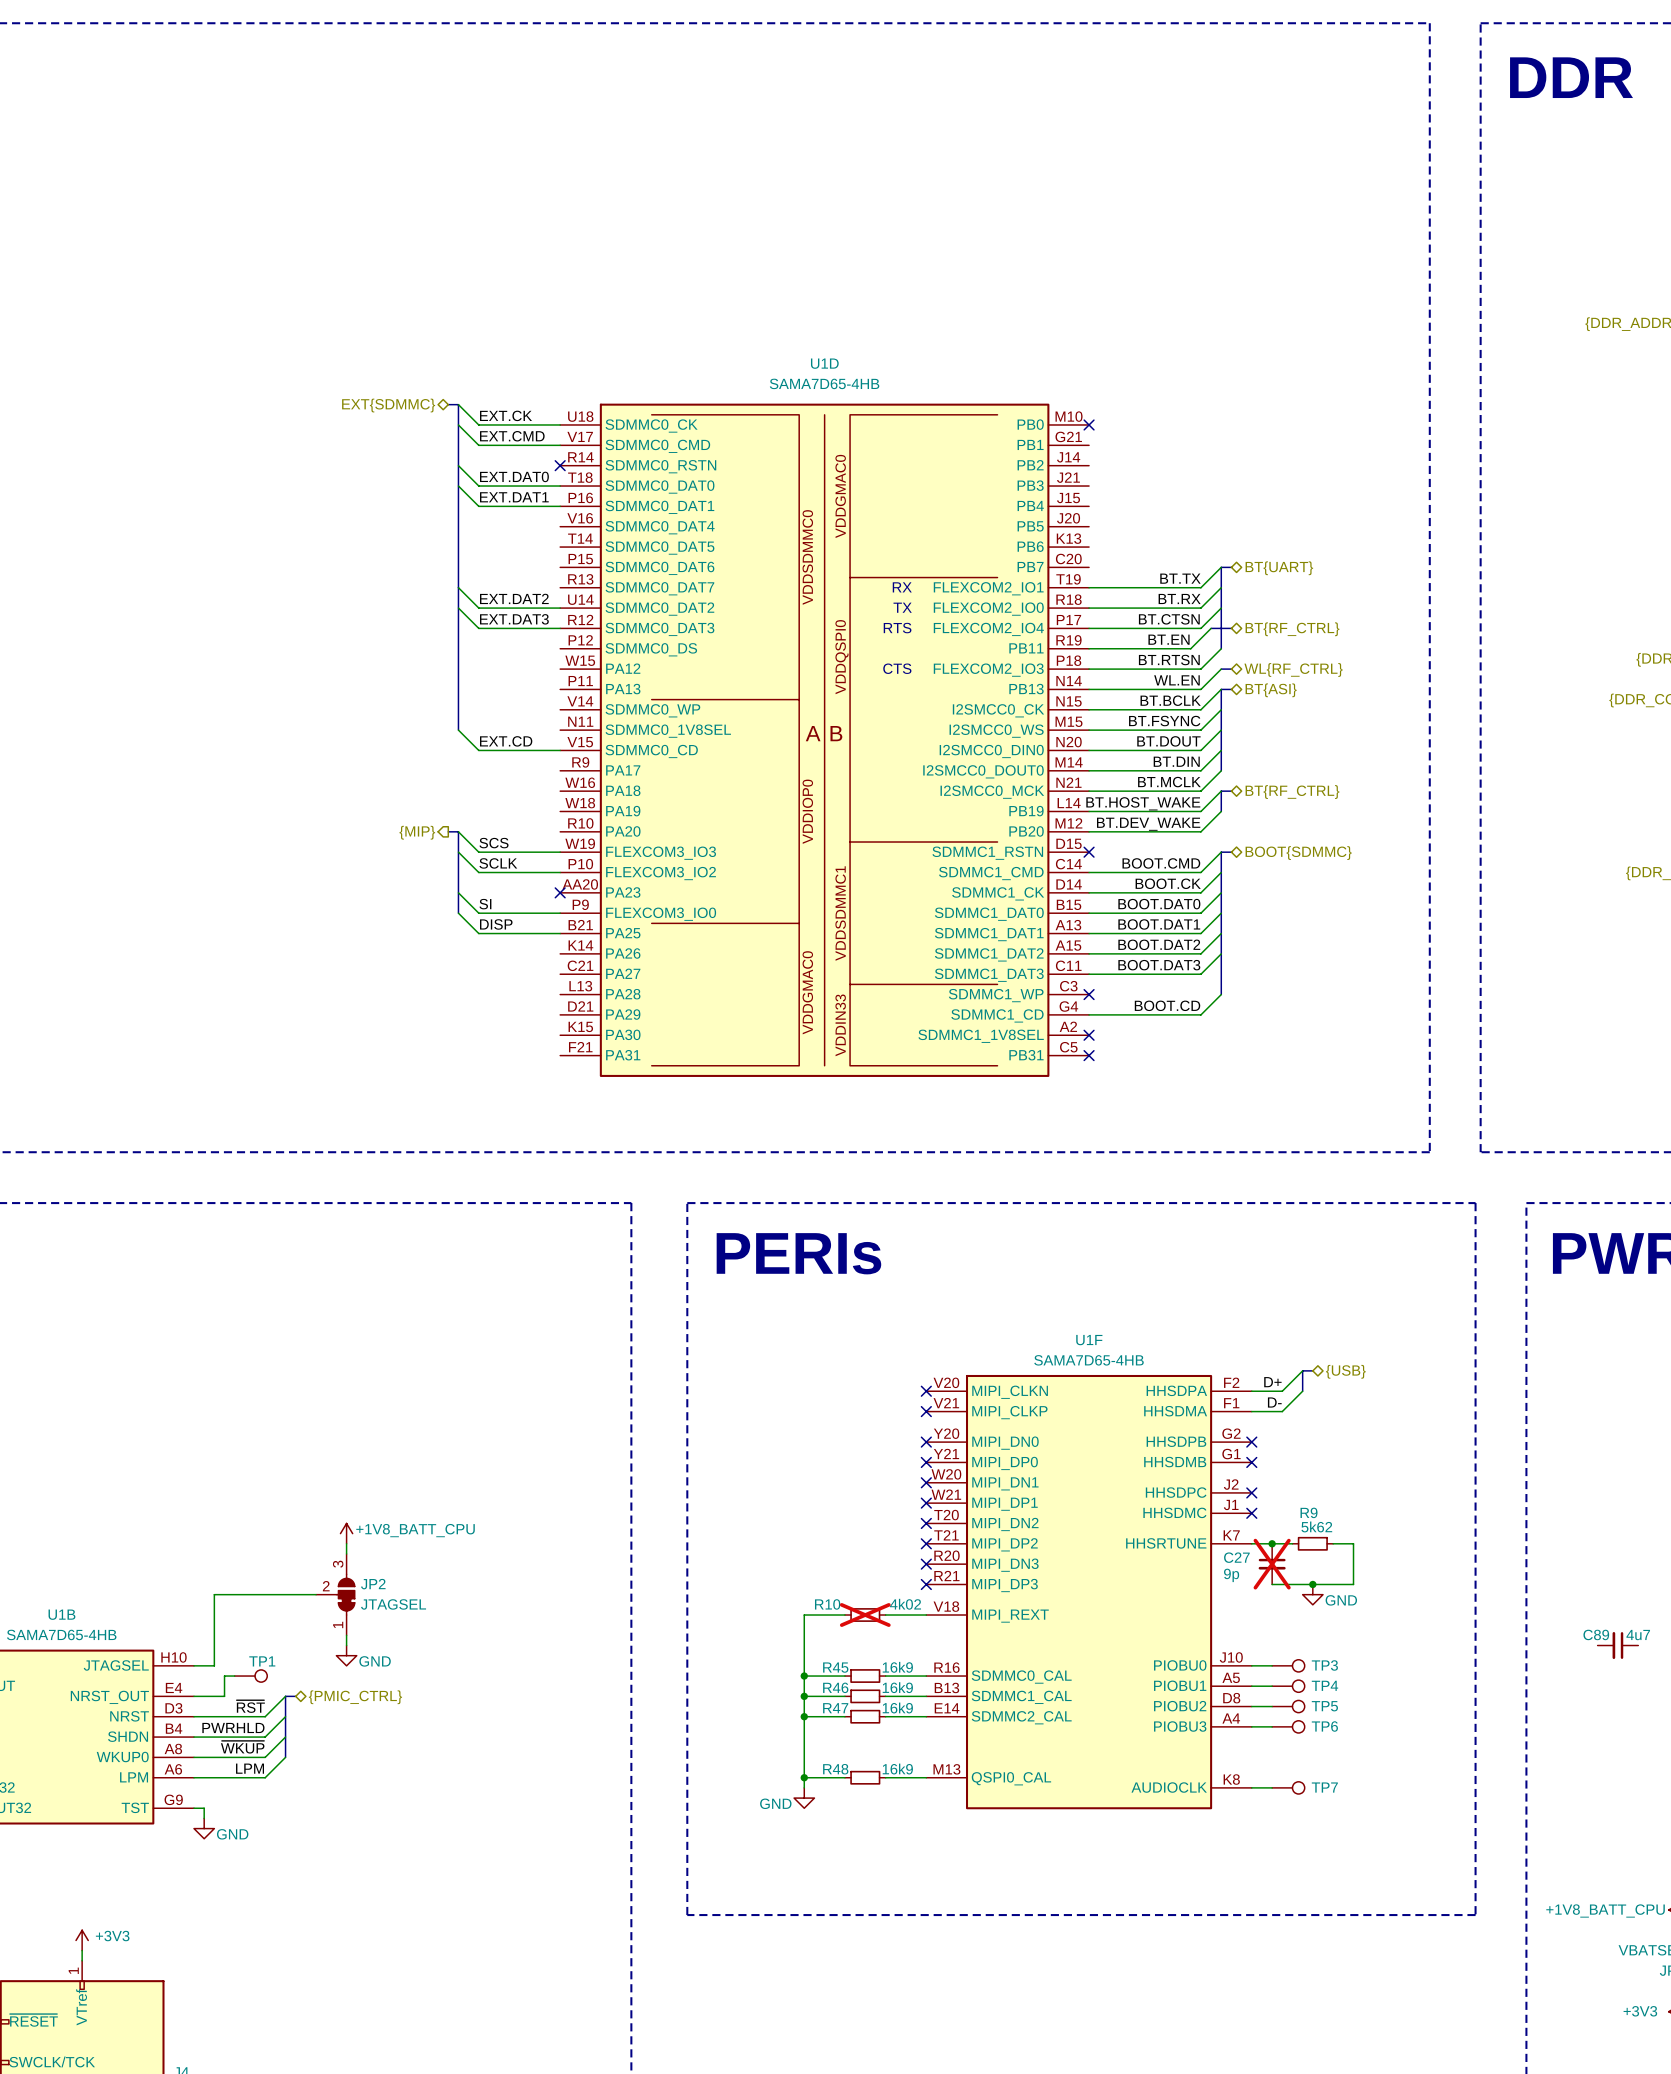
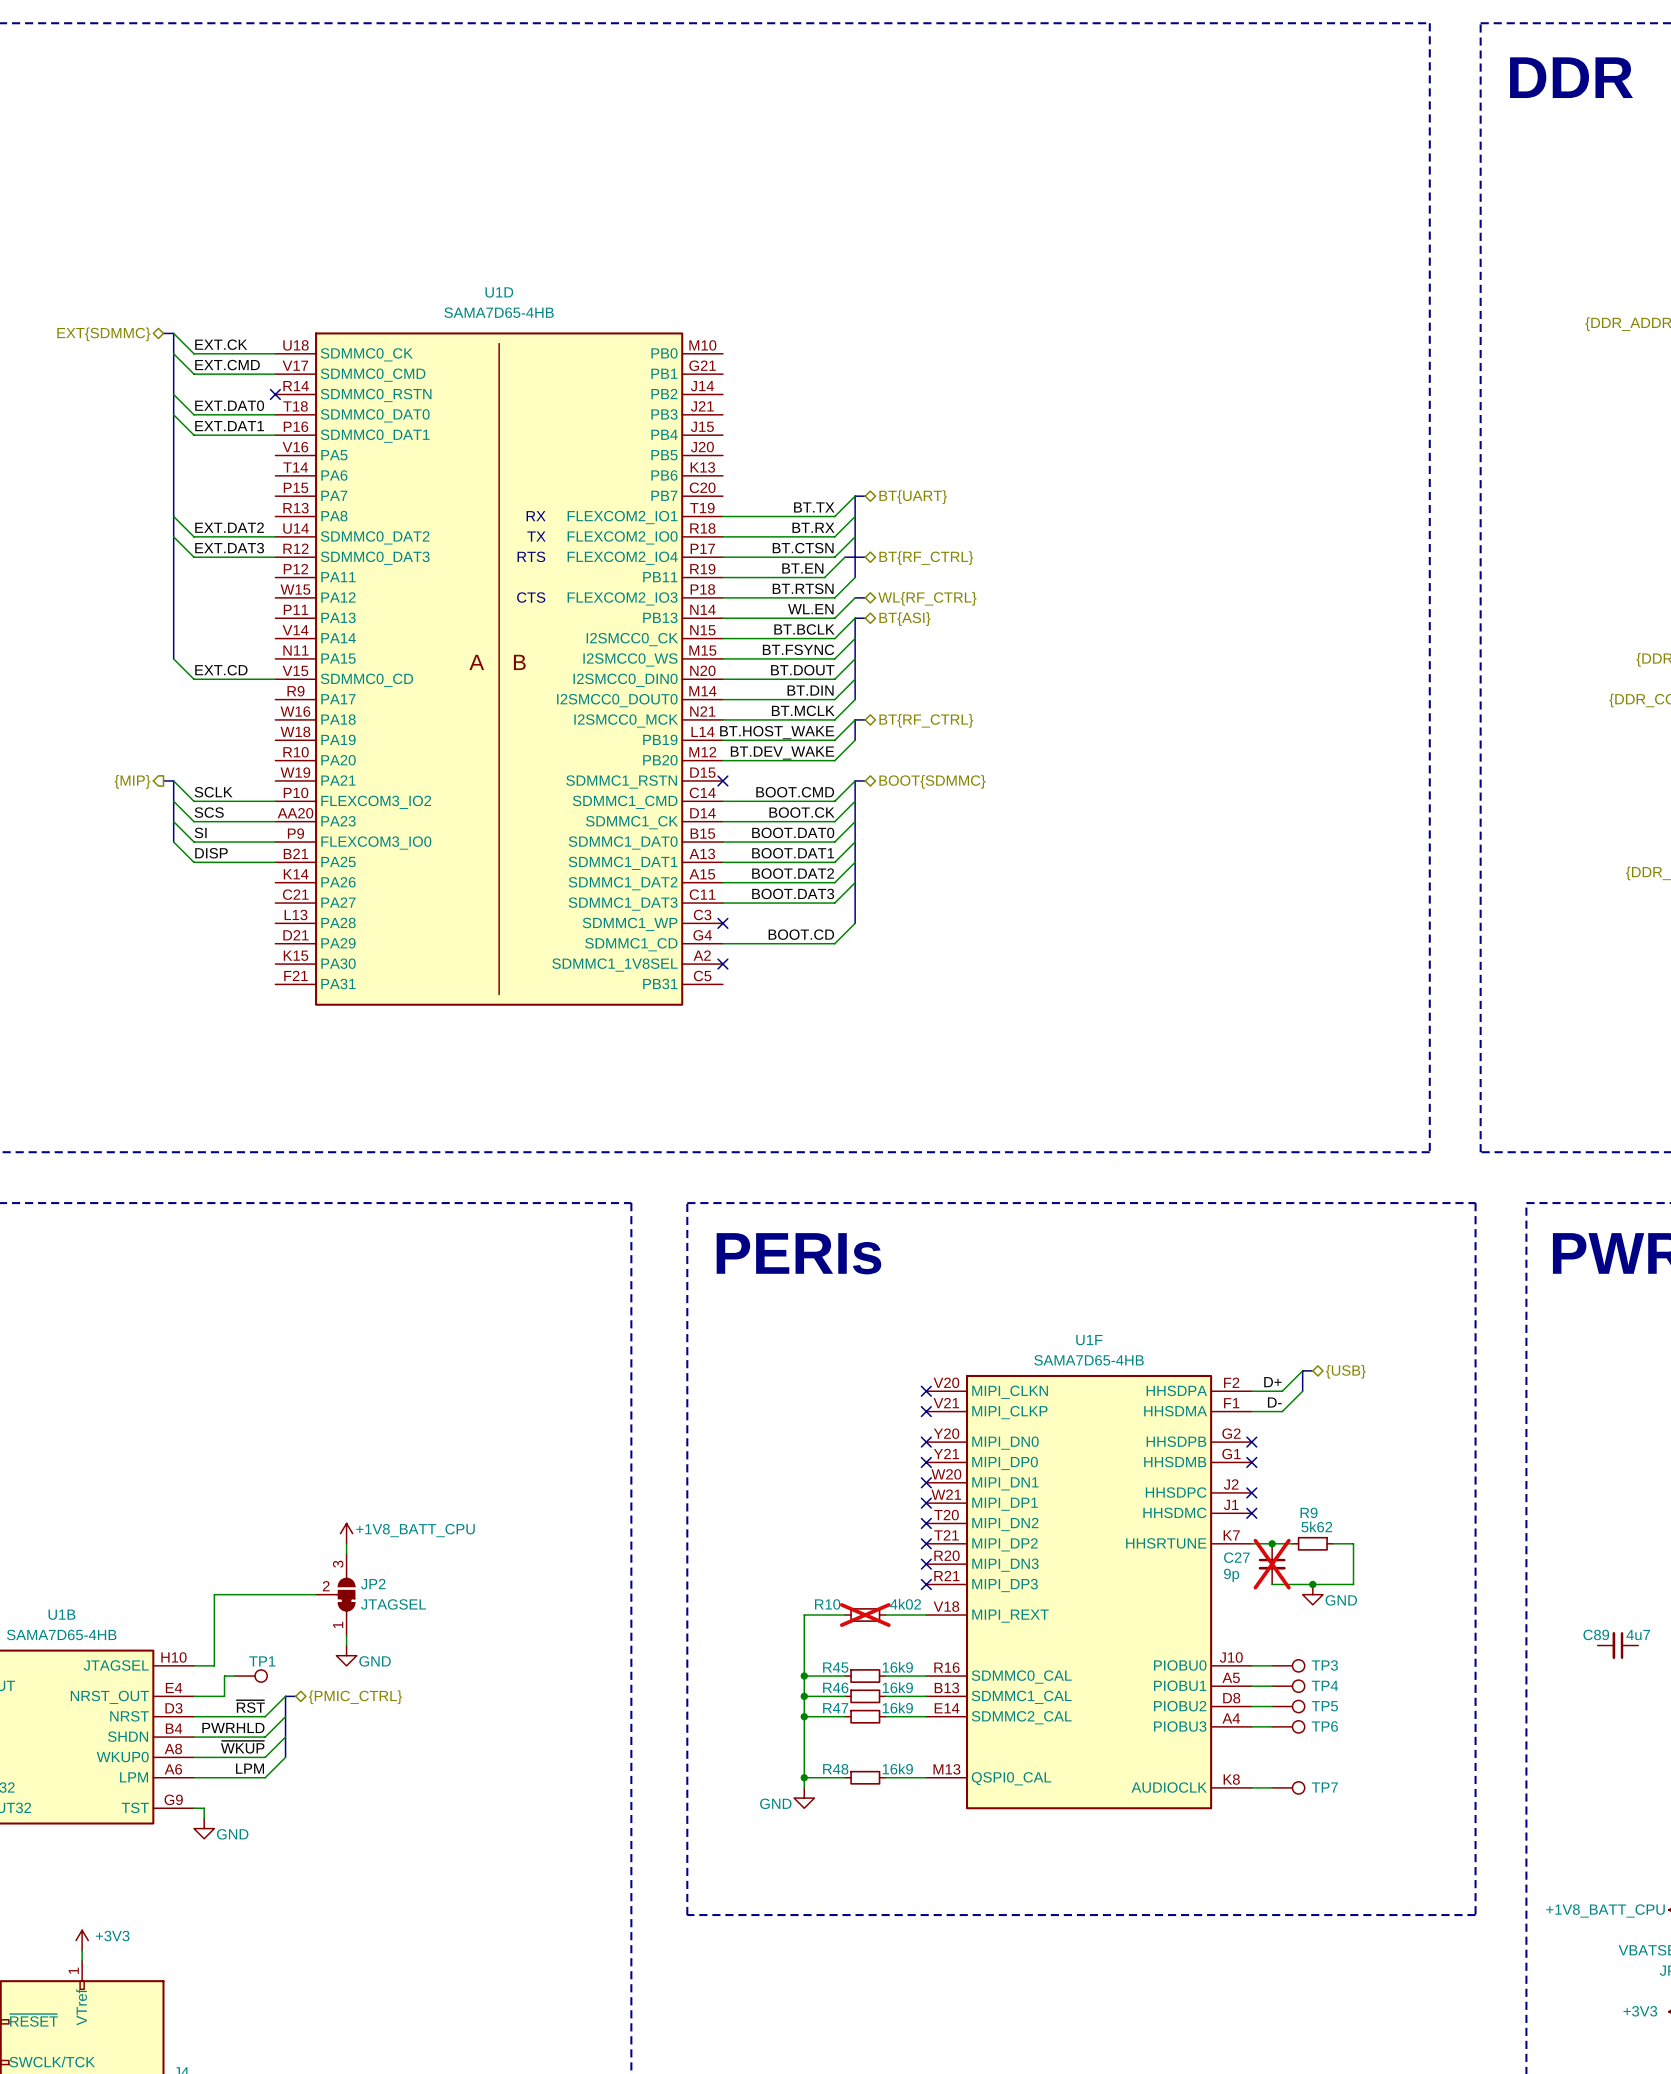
bus: none -> (163, 333) (173, 333) (173, 658)
wire: none -> (173, 333) (194, 353) (275, 353)
hierarchical label: none -> EXT{SDMMC} (103, 334)
label: none -> EXT.CK (221, 344)
wire: none -> (173, 353) (194, 374) (275, 374)
label: none -> EXT.CMD (227, 365)
wire: none -> (173, 394) (194, 414) (275, 414)
no-connect mark: none -> (275, 394)
U1D symbol: [560, 403, 1090, 1077] -> [275, 332, 723, 1006]
bus: (448, 404) (458, 404) (458, 730) -> none
label: none -> EXT.DAT0 (229, 405)
hierarchical label: EXT{SDMMC} (388, 405) -> none
wire: none -> (173, 414) (194, 435) (275, 435)
label: EXT.CK (506, 415) -> none
no-connect mark: (1089, 424) -> none
label: none -> EXT.DAT1 (229, 426)
label: EXT.CMD (512, 436) -> none
no-connect mark: (560, 465) -> none
label: EXT.DAT0 (514, 476) -> none
bus: none -> (865, 496) (855, 496) (855, 577)
label: EXT.DAT1 (514, 497) -> none
hierarchical label: none -> BT{UART} (913, 497)
label: none -> BT.TX (814, 507)
wire: none -> (173, 516) (194, 536) (275, 536)
text: none -> RX (536, 516)
label: none -> EXT.DAT2 (229, 527)
label: none -> BT.RX (813, 527)
wire: none -> (173, 536) (194, 557) (275, 557)
text: none -> TX (536, 536)
label: none -> EXT.DAT3 (229, 548)
label: none -> BT.CTSN (803, 548)
text: none -> RTS (531, 556)
bus: none -> (844, 557) (865, 557)
hierarchical label: none -> BT{RF_CTRL} (926, 558)
wire: (1221, 567) (1200, 587) (1089, 587) -> none
bus: (1231, 567) (1221, 567) (1221, 648) -> none
label: none -> BT.EN (802, 568)
hierarchical label: BT{UART} (1279, 568) -> none
label: BT.TX (1180, 578) -> none
text: RX (902, 587) -> none
wire: (1221, 587) (1200, 608) (1089, 608) -> none
label: none -> BT.RTSN (803, 588)
text: none -> CTS (531, 597)
bus: none -> (855, 597) (865, 597)
label: EXT.DAT2 (514, 598) -> none
hierarchical label: none -> WL{RF_CTRL} (927, 598)
label: BT.RX (1179, 598) -> none
text: TX (902, 607) -> none
wire: (1221, 608) (1200, 628) (1089, 628) -> none
label: none -> WL.EN (810, 609)
bus: none -> (865, 618) (855, 618) (855, 699)
label: EXT.DAT3 (514, 619) -> none
hierarchical label: none -> BT{ASI} (904, 619)
label: BT.CTSN (1169, 619) -> none
text: RTS (897, 628) -> none
wire: (1211, 628) (1190, 648) (1089, 648) -> none
bus: (1211, 628) (1231, 628) -> none
label: none -> BT.BCLK (804, 629)
hierarchical label: BT{RF_CTRL} (1292, 629) -> none
label: BT.EN (1169, 639) -> none
wire: (1221, 648) (1200, 669) (1089, 669) -> none
label: none -> BT.FSYNC (798, 649)
wire: none -> (173, 658) (194, 679) (275, 679)
label: BT.RTSN (1169, 660) -> none
text: CTS (897, 668) -> none
wire: (1221, 669) (1200, 689) (1089, 689) -> none
bus: (1221, 669) (1231, 669) -> none
hierarchical label: WL{RF_CTRL} (1293, 669) -> none
label: none -> EXT.CD (221, 670)
label: none -> BT.DOUT (802, 670)
label: WL.EN (1176, 680) -> none
wire: (1221, 689) (1200, 709) (1089, 709) -> none
bus: (1231, 689) (1221, 689) (1221, 770) -> none
label: none -> BT.DIN (810, 690)
hierarchical label: BT{ASI} (1271, 690) -> none
label: BT.BCLK (1170, 700) -> none
wire: (1221, 709) (1200, 730) (1089, 730) -> none
label: none -> BT.MCLK (803, 710)
bus: none -> (865, 719) (855, 719) (855, 740)
hierarchical label: none -> BT{RF_CTRL} (926, 720)
label: BT.FSYNC (1164, 721) -> none
wire: (1221, 730) (1200, 750) (1089, 750) -> none
label: none -> BT.HOST_WAKE (777, 732)
label: EXT.CD (506, 741) -> none
label: BT.DOUT (1168, 741) -> none
wire: (1221, 750) (1200, 770) (1089, 770) -> none
label: none -> BT.DEV_WAKE (782, 753)
label: BT.DIN (1176, 761) -> none
wire: (1221, 770) (1200, 791) (1089, 791) -> none
bus: none -> (163, 780) (173, 780) (173, 842)
wire: none -> (173, 780) (194, 801) (275, 801)
no-connect mark: none -> (722, 780)
bus: none -> (865, 780) (855, 780) (855, 923)
hierarchical label: none -> {MIP} (132, 781)
hierarchical label: none -> BOOT{SDMMC} (932, 781)
label: BT.MCLK (1169, 782) -> none
wire: (1221, 791) (1200, 811) (1089, 811) -> none
bus: (1231, 791) (1221, 791) (1221, 811) -> none
label: none -> SCLK (213, 792)
label: none -> BOOT.CMD (795, 792)
hierarchical label: BT{RF_CTRL} (1292, 792) -> none
wire: none -> (173, 801) (194, 821) (275, 821)
label: BT.HOST_WAKE (1143, 803) -> none
wire: (1221, 811) (1200, 831) (1089, 831) -> none
label: none -> SCS (209, 812)
label: none -> BOOT.CK (802, 812)
wire: none -> (173, 821) (194, 842) (275, 842)
label: BT.DEV_WAKE (1148, 824) -> none
bus: (448, 831) (458, 831) (458, 913) -> none
label: none -> SI (200, 832)
hierarchical label: {MIP} (417, 832) -> none
label: none -> BOOT.DAT0 (793, 832)
wire: none -> (173, 842) (194, 862) (275, 862)
label: SCS (493, 843) -> none
no-connect mark: (1089, 852) -> none
wire: (1221, 852) (1200, 872) (1089, 872) -> none
bus: (1231, 852) (1221, 852) (1221, 994) -> none
label: none -> DISP (211, 853)
label: none -> BOOT.DAT1 (793, 853)
hierarchical label: BOOT{SDMMC} (1298, 853) -> none
label: SCLK (498, 863) -> none
label: BOOT.CMD (1161, 863) -> none
wire: (1221, 872) (1200, 892) (1089, 892) -> none
label: none -> BOOT.DAT2 (793, 873)
label: BOOT.CK (1168, 883) -> none
no-connect mark: (560, 892) -> none
wire: (1221, 892) (1200, 913) (1089, 913) -> none
label: none -> BOOT.DAT3 (793, 893)
label: SI (485, 904) -> none
label: BOOT.DAT0 (1159, 904) -> none
wire: (1221, 913) (1200, 933) (1089, 933) -> none
no-connect mark: none -> (722, 923)
label: DISP (496, 924) -> none
label: BOOT.DAT1 (1159, 924) -> none
wire: (1221, 933) (1200, 953) (1089, 953) -> none
label: none -> BOOT.CD (801, 934)
label: BOOT.DAT2 (1159, 944) -> none
wire: (1221, 953) (1200, 974) (1089, 974) -> none
no-connect mark: none -> (722, 964)
label: BOOT.DAT3 (1159, 965) -> none
no-connect mark: (1089, 994) -> none
wire: (1221, 994) (1200, 1014) (1089, 1014) -> none
label: BOOT.CD (1167, 1005) -> none
no-connect mark: (1089, 1035) -> none
no-connect mark: (1089, 1055) -> none

